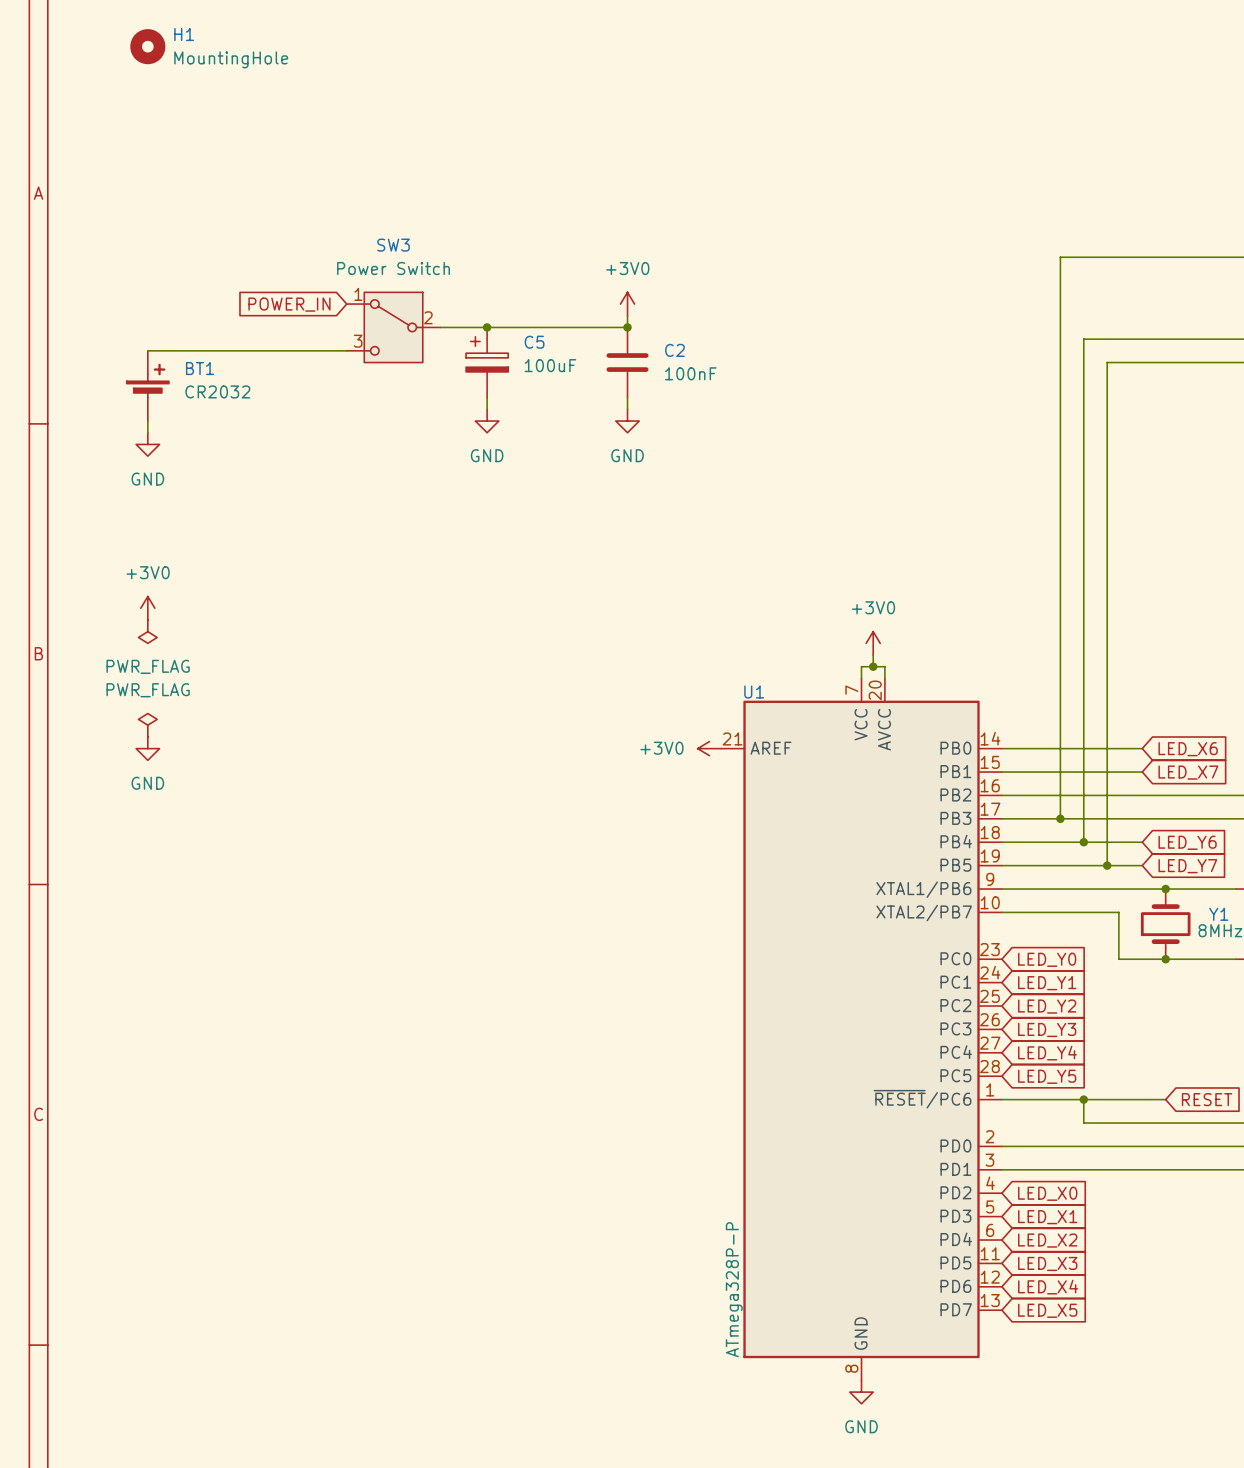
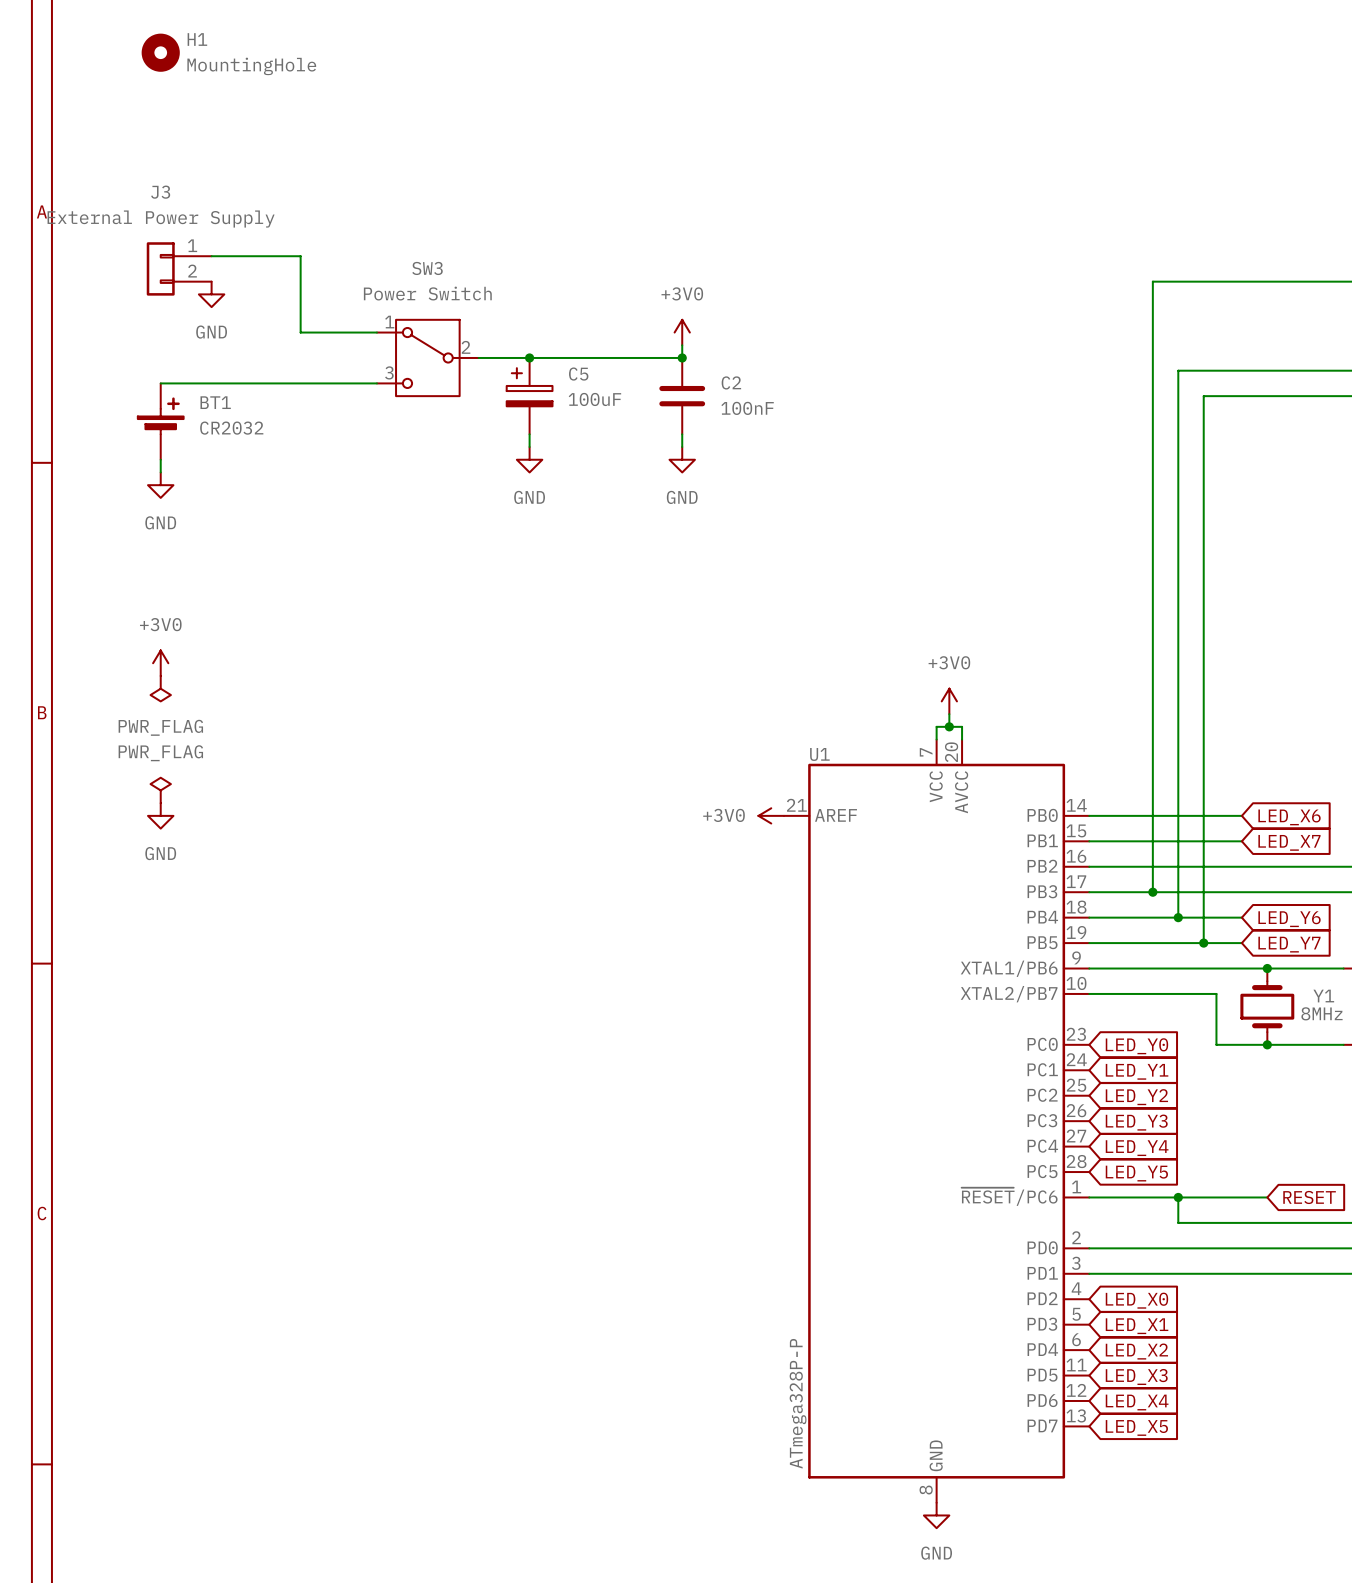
wire: none -> (211, 256) (300, 256) (300, 332) (376, 332)
J3: none -> External Power Supply (179, 268)
power symbol: none -> GND (211, 294)
global label: POWER_IN (289, 304) -> none

